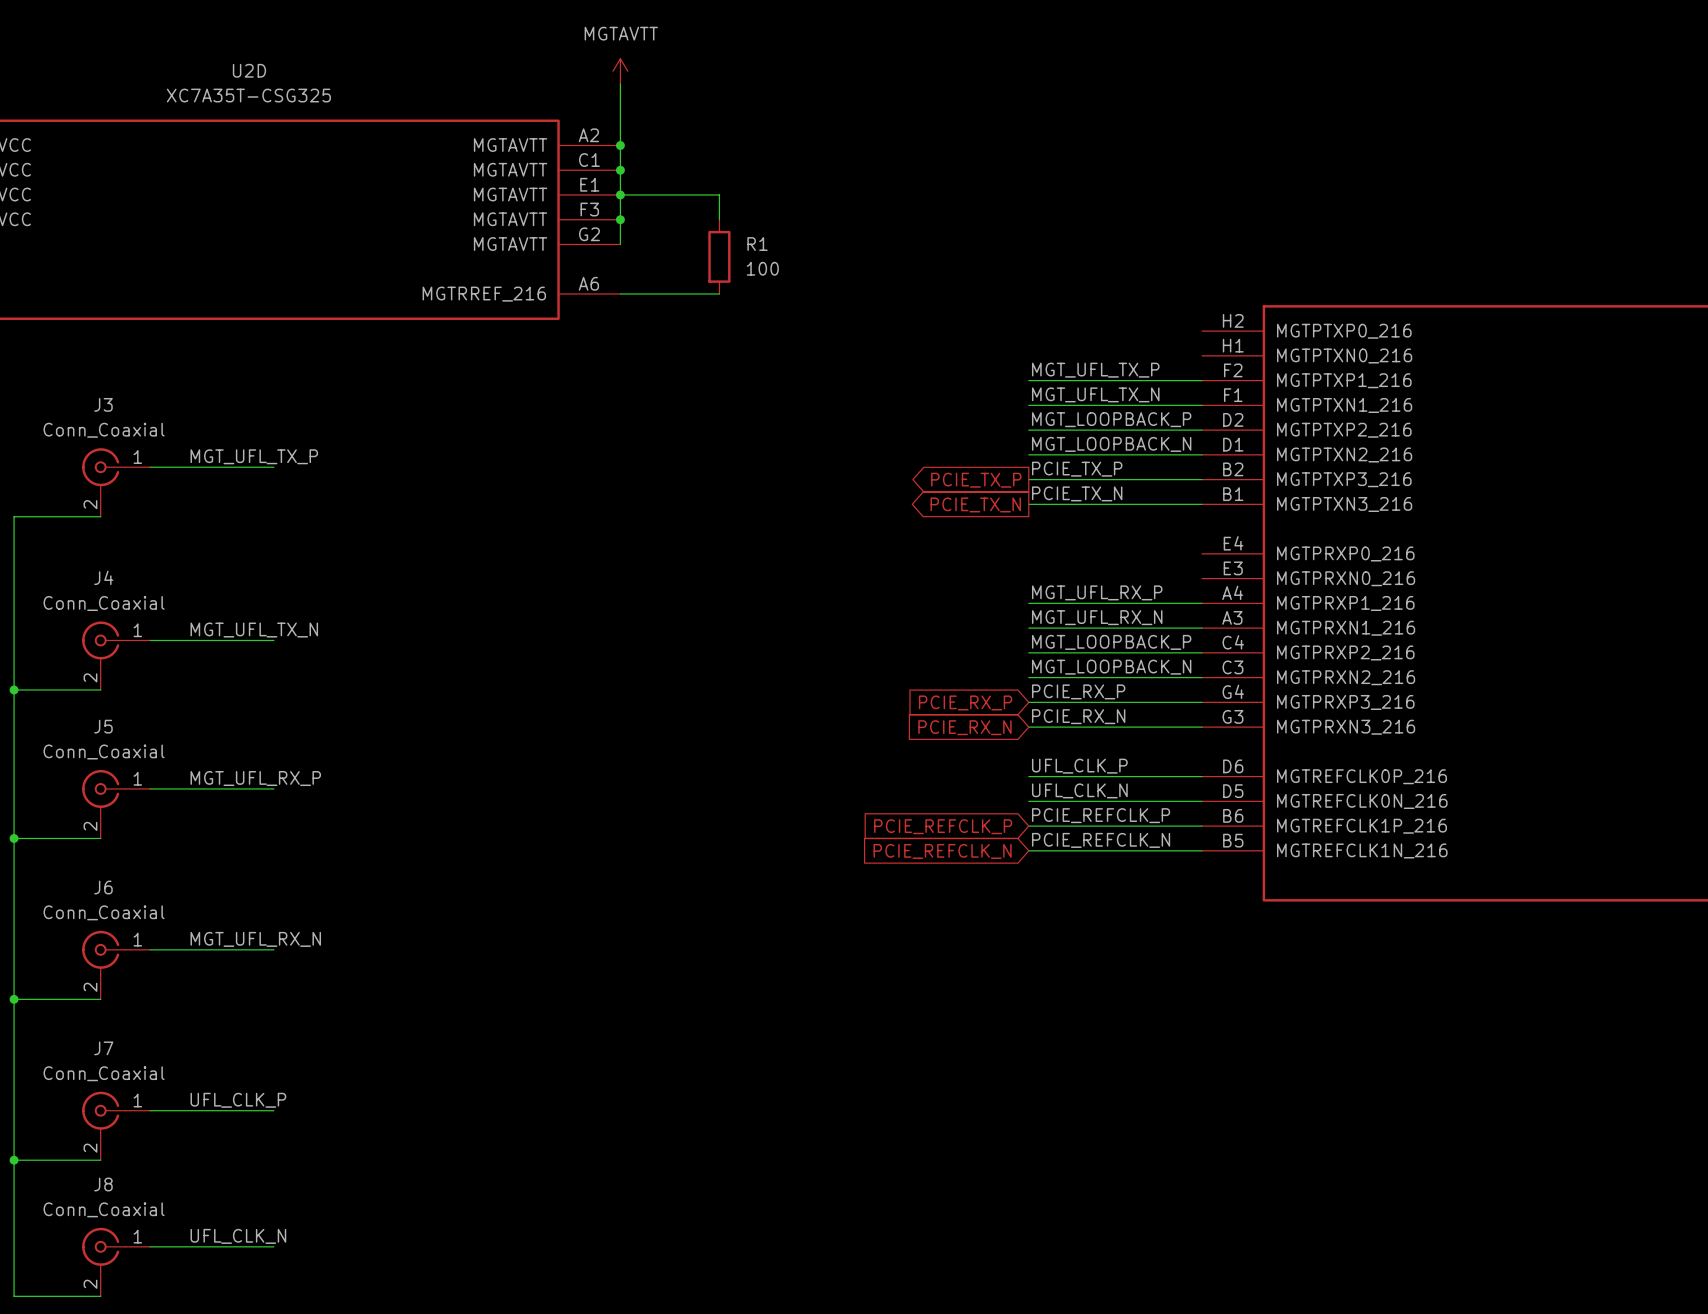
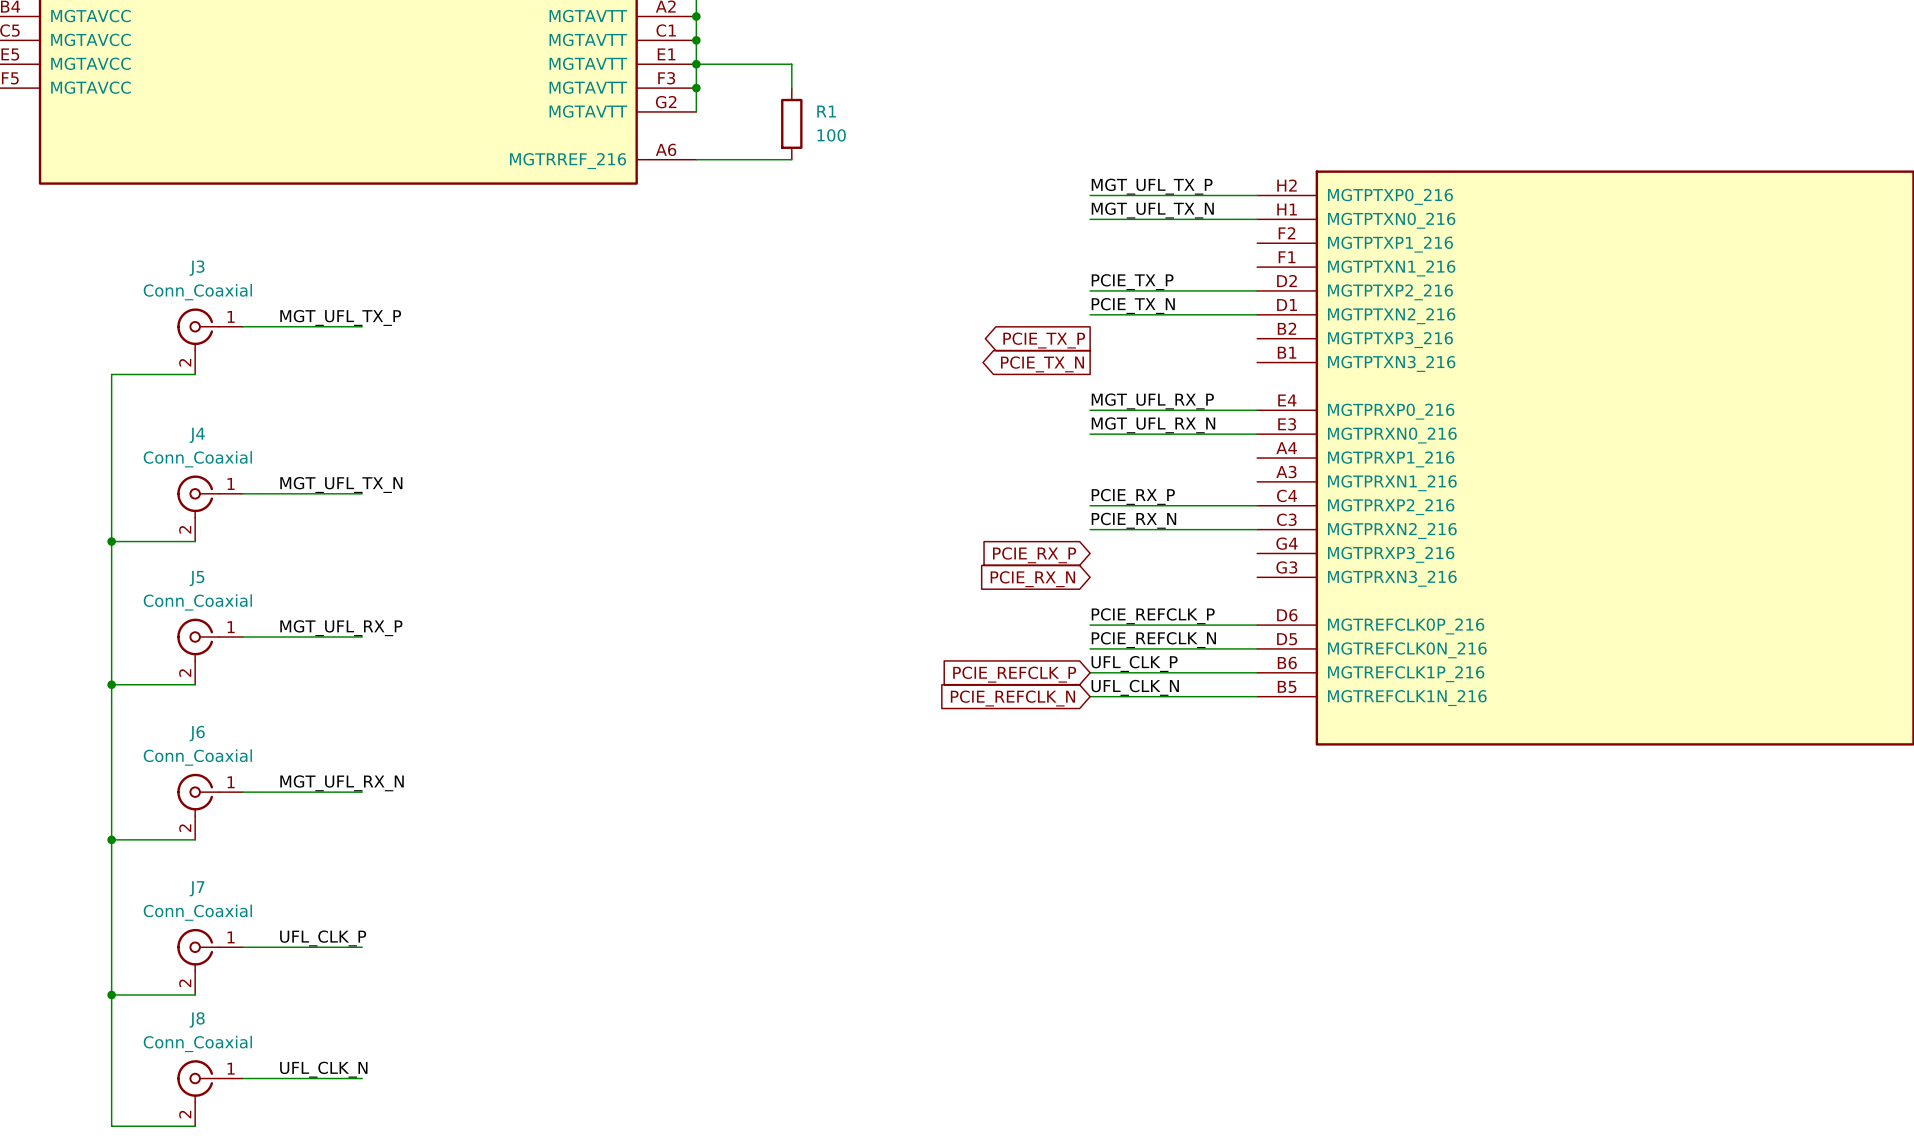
label position: MGT_UFL_TX_P (1095, 370) -> MGT_UFL_TX_P (1152, 186)
wire: (1028, 380) (1202, 380) -> (1090, 195) (1257, 195)
label position: MGT_UFL_TX_N (1095, 394) -> MGT_UFL_TX_N (1152, 210)
wire: (1028, 405) (1202, 405) -> (1090, 219) (1257, 219)
label: MGT_LOOPBACK_P (1111, 419) -> PCIE_TX_P (1132, 282)
label: MGT_LOOPBACK_N (1111, 444) -> PCIE_TX_N (1133, 306)
label: PCIE_TX_P (1077, 469) -> none
wire: (1028, 479) (1202, 479) -> none
label: PCIE_TX_N (1077, 493) -> none
wire: (1028, 504) (1202, 504) -> none
label position: MGT_UFL_RX_P (1097, 592) -> MGT_UFL_RX_P (1152, 401)
wire: (1028, 603) (1202, 603) -> (1090, 410) (1257, 410)
label position: MGT_UFL_RX_N (1097, 617) -> MGT_UFL_RX_N (1153, 425)
wire: (1028, 628) (1202, 628) -> (1090, 434) (1257, 434)
label: MGT_LOOPBACK_P (1111, 642) -> PCIE_RX_P (1133, 496)
label: MGT_LOOPBACK_N (1111, 667) -> PCIE_RX_N (1133, 520)
label: PCIE_RX_P (1078, 691) -> none
wire: (1028, 702) (1202, 702) -> none
label: PCIE_RX_N (1078, 716) -> none
wire: (1028, 727) (1202, 727) -> none
label: UFL_CLK_P (1079, 766) -> PCIE_REFCLK_P (1153, 616)
label: UFL_CLK_N (1079, 790) -> PCIE_REFCLK_N (1153, 640)
label: PCIE_REFCLK_P (1101, 815) -> UFL_CLK_P (1134, 663)
label: PCIE_REFCLK_N (1101, 840) -> UFL_CLK_N (1135, 687)

